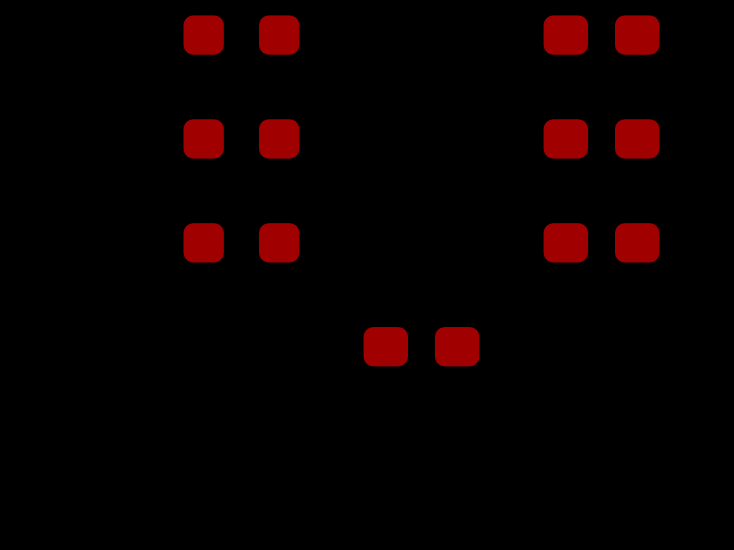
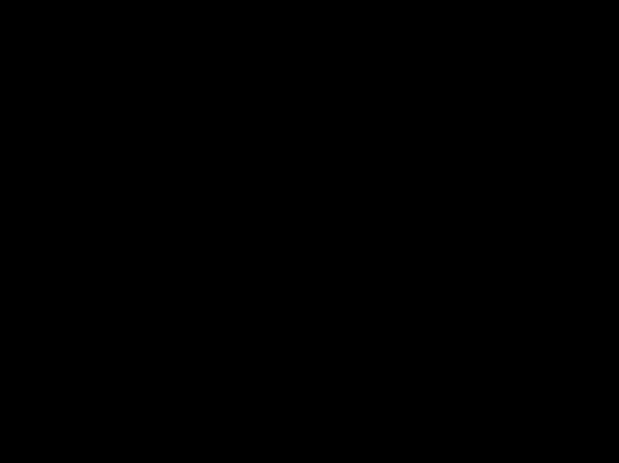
part: (241, 35) -> none
part: (601, 35) -> none
part: (241, 138) -> none
part: (601, 138) -> none
part: (241, 242) -> none
part: (601, 242) -> none
part: (421, 346) -> none

